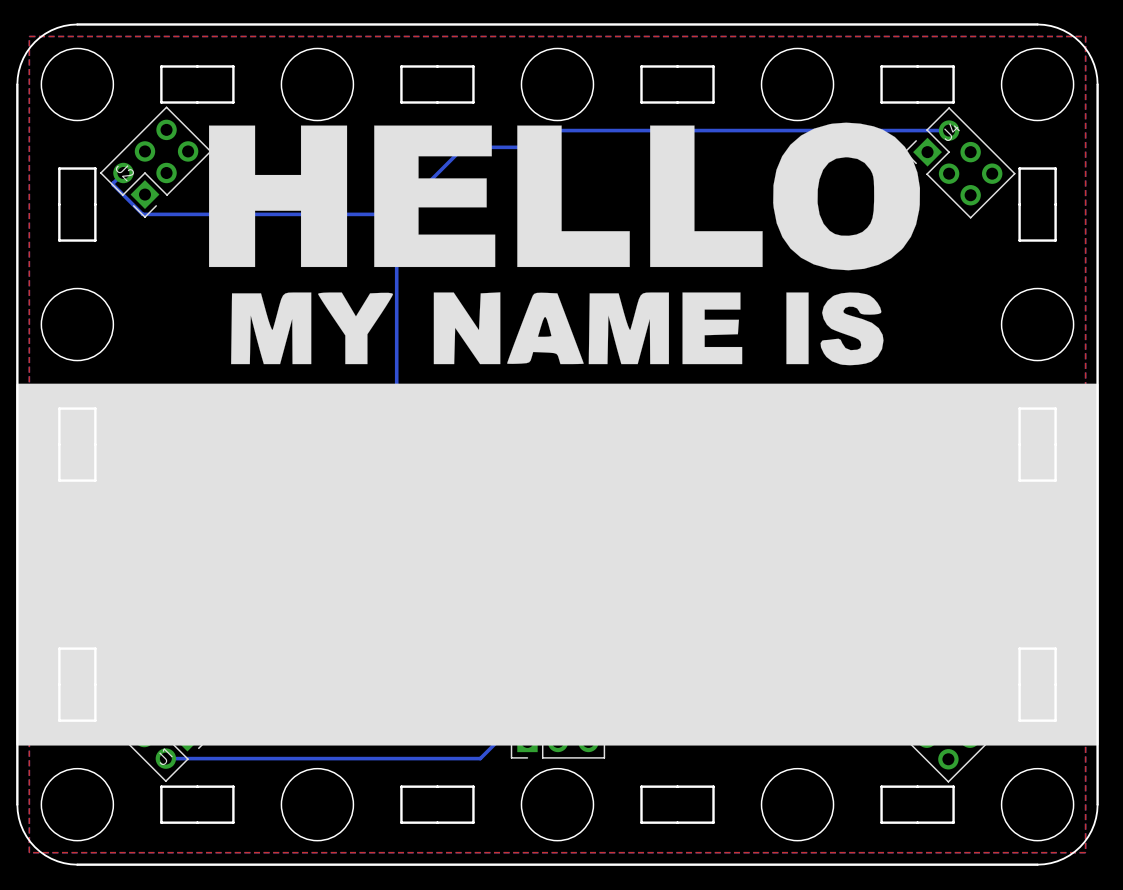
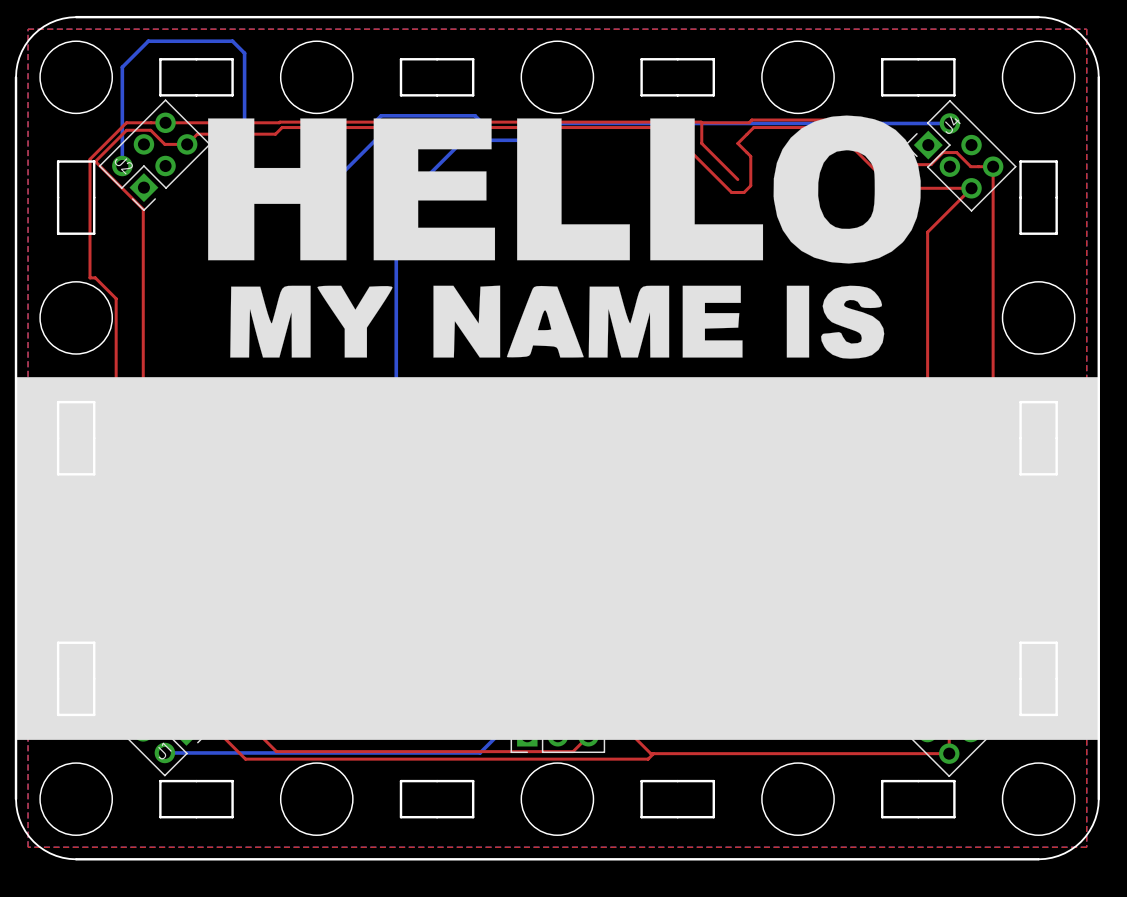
top track: none -> (701, 122) (749, 122) (751, 120) (859, 120) (904, 164) (931, 164) (943, 152) (956, 152) (970, 166) (993, 166) (993, 546) (935, 604) (935, 718) (949, 732) (949, 753) (650, 753) (602, 705) (588, 705)
top track: none -> (701, 122) (126, 122) (90, 159) (90, 277) (95, 277) (116, 298) (116, 663) (121, 669) (121, 709) (142, 709) (156, 695) (181, 695) (245, 759) (648, 759) (653, 753)
top track: none -> (701, 122) (701, 143) (737, 179)
top track: none -> (282, 127) (275, 134) (197, 134) (187, 144) (164, 144) (150, 130) (126, 130) (95, 161) (143, 209) (143, 688) (213, 688) (276, 751) (573, 751) (588, 736) (574, 722) (574, 698) (582, 690) (871, 690) (913, 732) (927, 732) (927, 232) (971, 188) (893, 188) (832, 127) (753, 127) (737, 143) (750, 156) (750, 185) (744, 192) (731, 192) (667, 127) (282, 127)
bottom track: (123, 173) (113, 184) (142, 214) (396, 214) -> (122, 166) (122, 67) (148, 41) (232, 41) (244, 53) (244, 161) (268, 185) (330, 185) (376, 138) (376, 120) (381, 115) (475, 115) (482, 123)

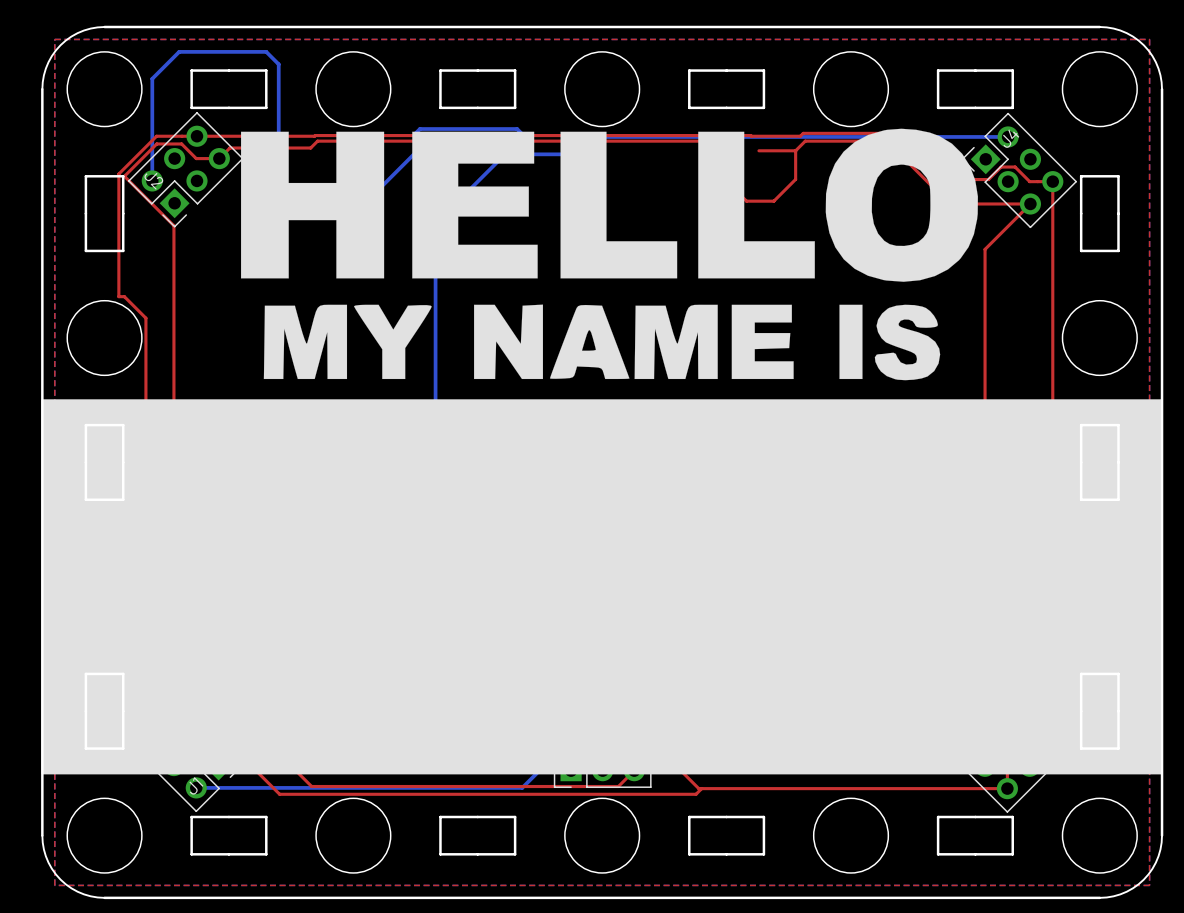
top track: (701, 122) (701, 143) (737, 179) -> none
top track: (667, 128) (731, 192) (744, 192) (750, 185) (750, 156) (737, 143) (744, 136) -> (716, 142) (716, 171) (746, 201) (773, 201) (795, 179) (795, 150) (758, 150)

